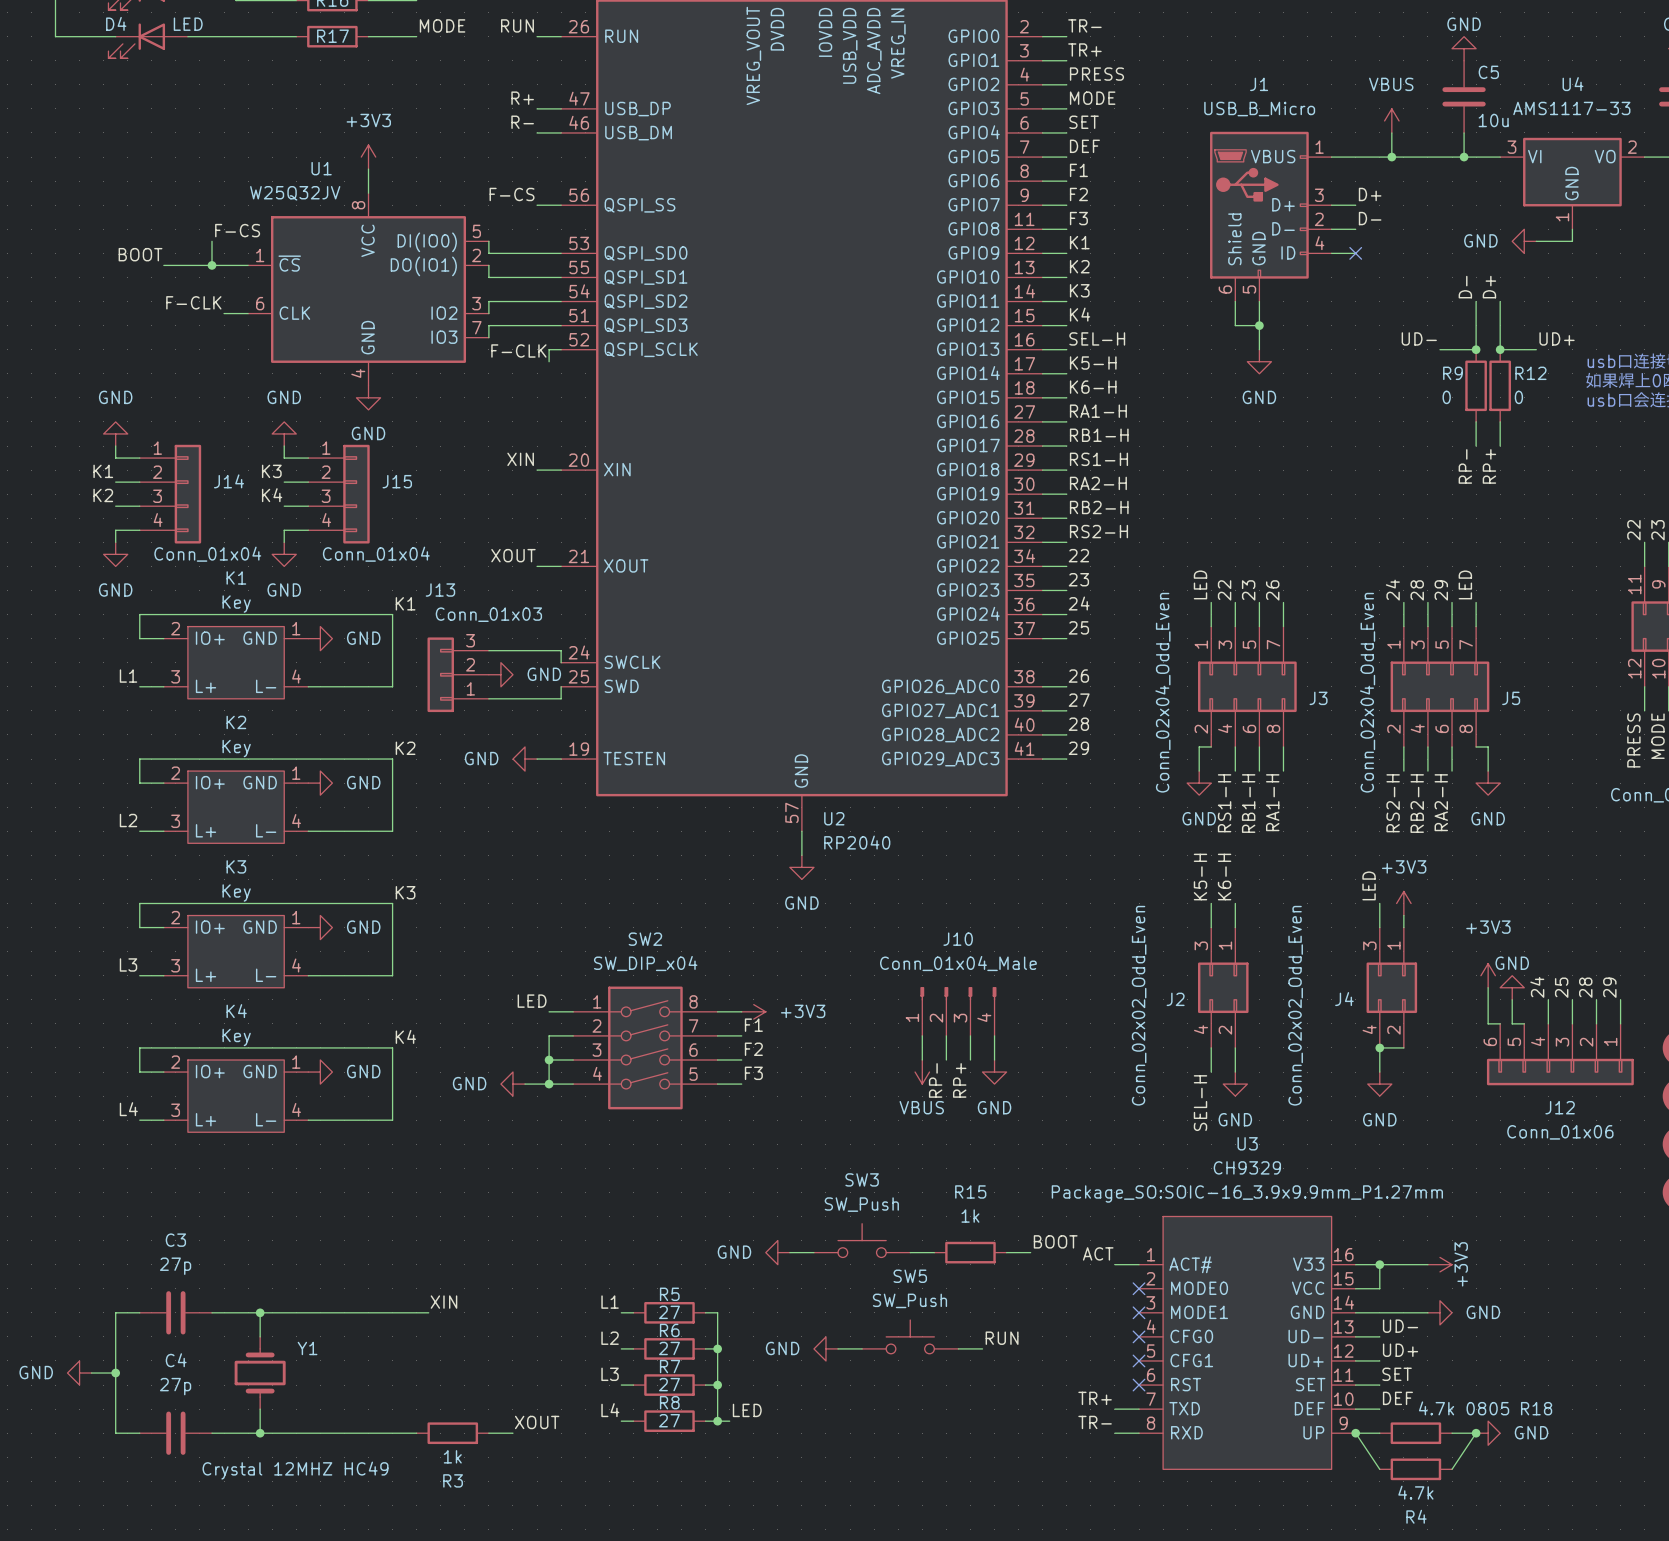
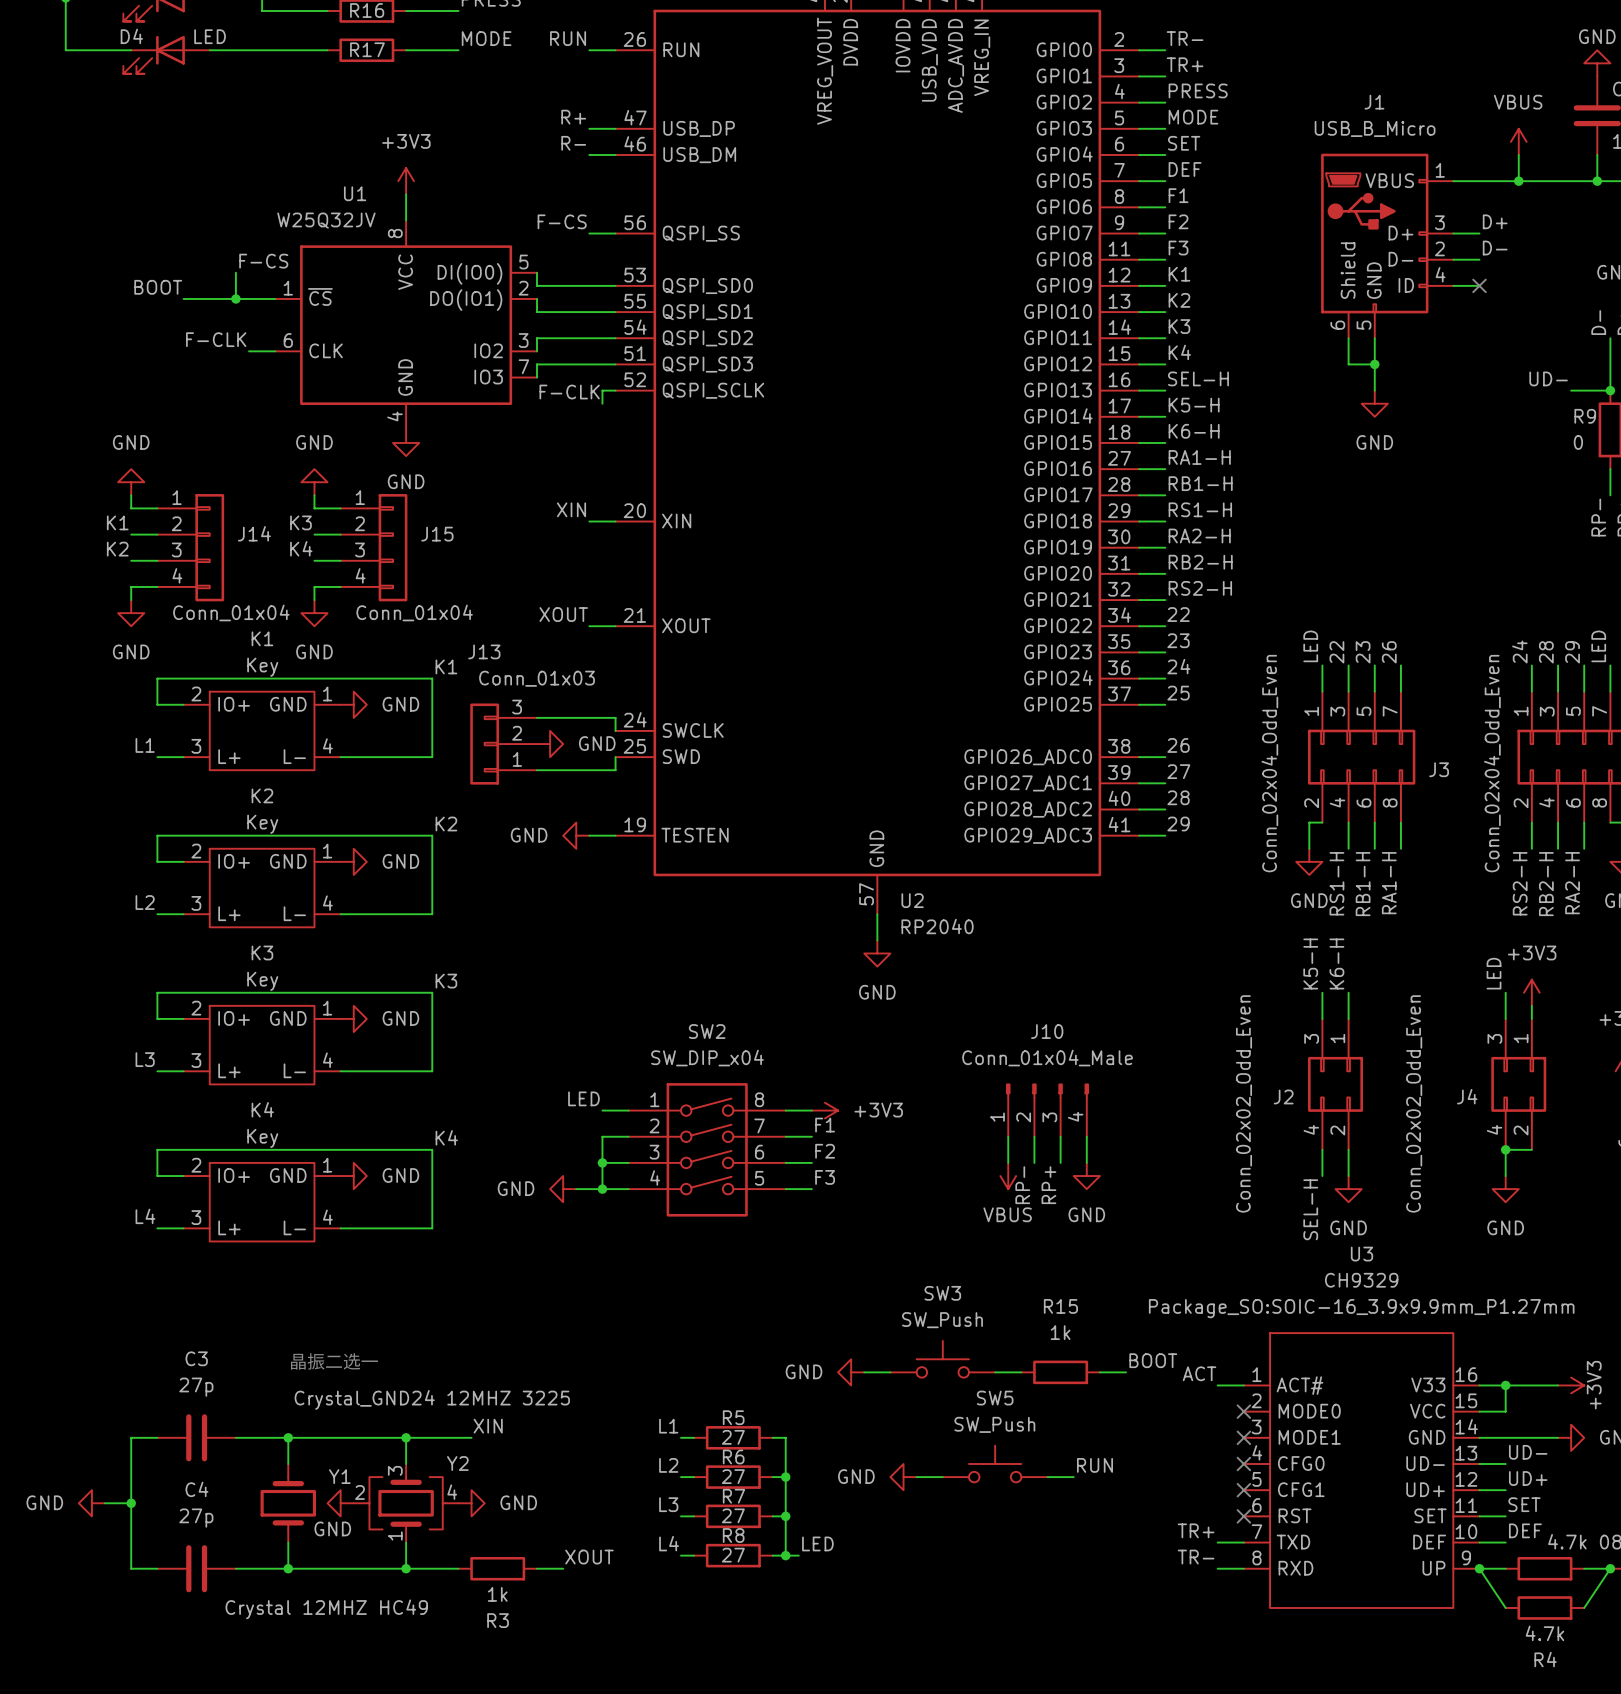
text: none -> 晶振二选一 (334, 1361)
wire: none -> (406, 1437) (406, 1464)
junction: none -> (406, 1437)
power symbol: none -> GND (340, 1503)
Y2: none -> Crystal_GND24 12MHZ 3225 (406, 1503)
power symbol: none -> GND (471, 1503)
wire: none -> (406, 1542) (406, 1568)
junction: none -> (406, 1568)

